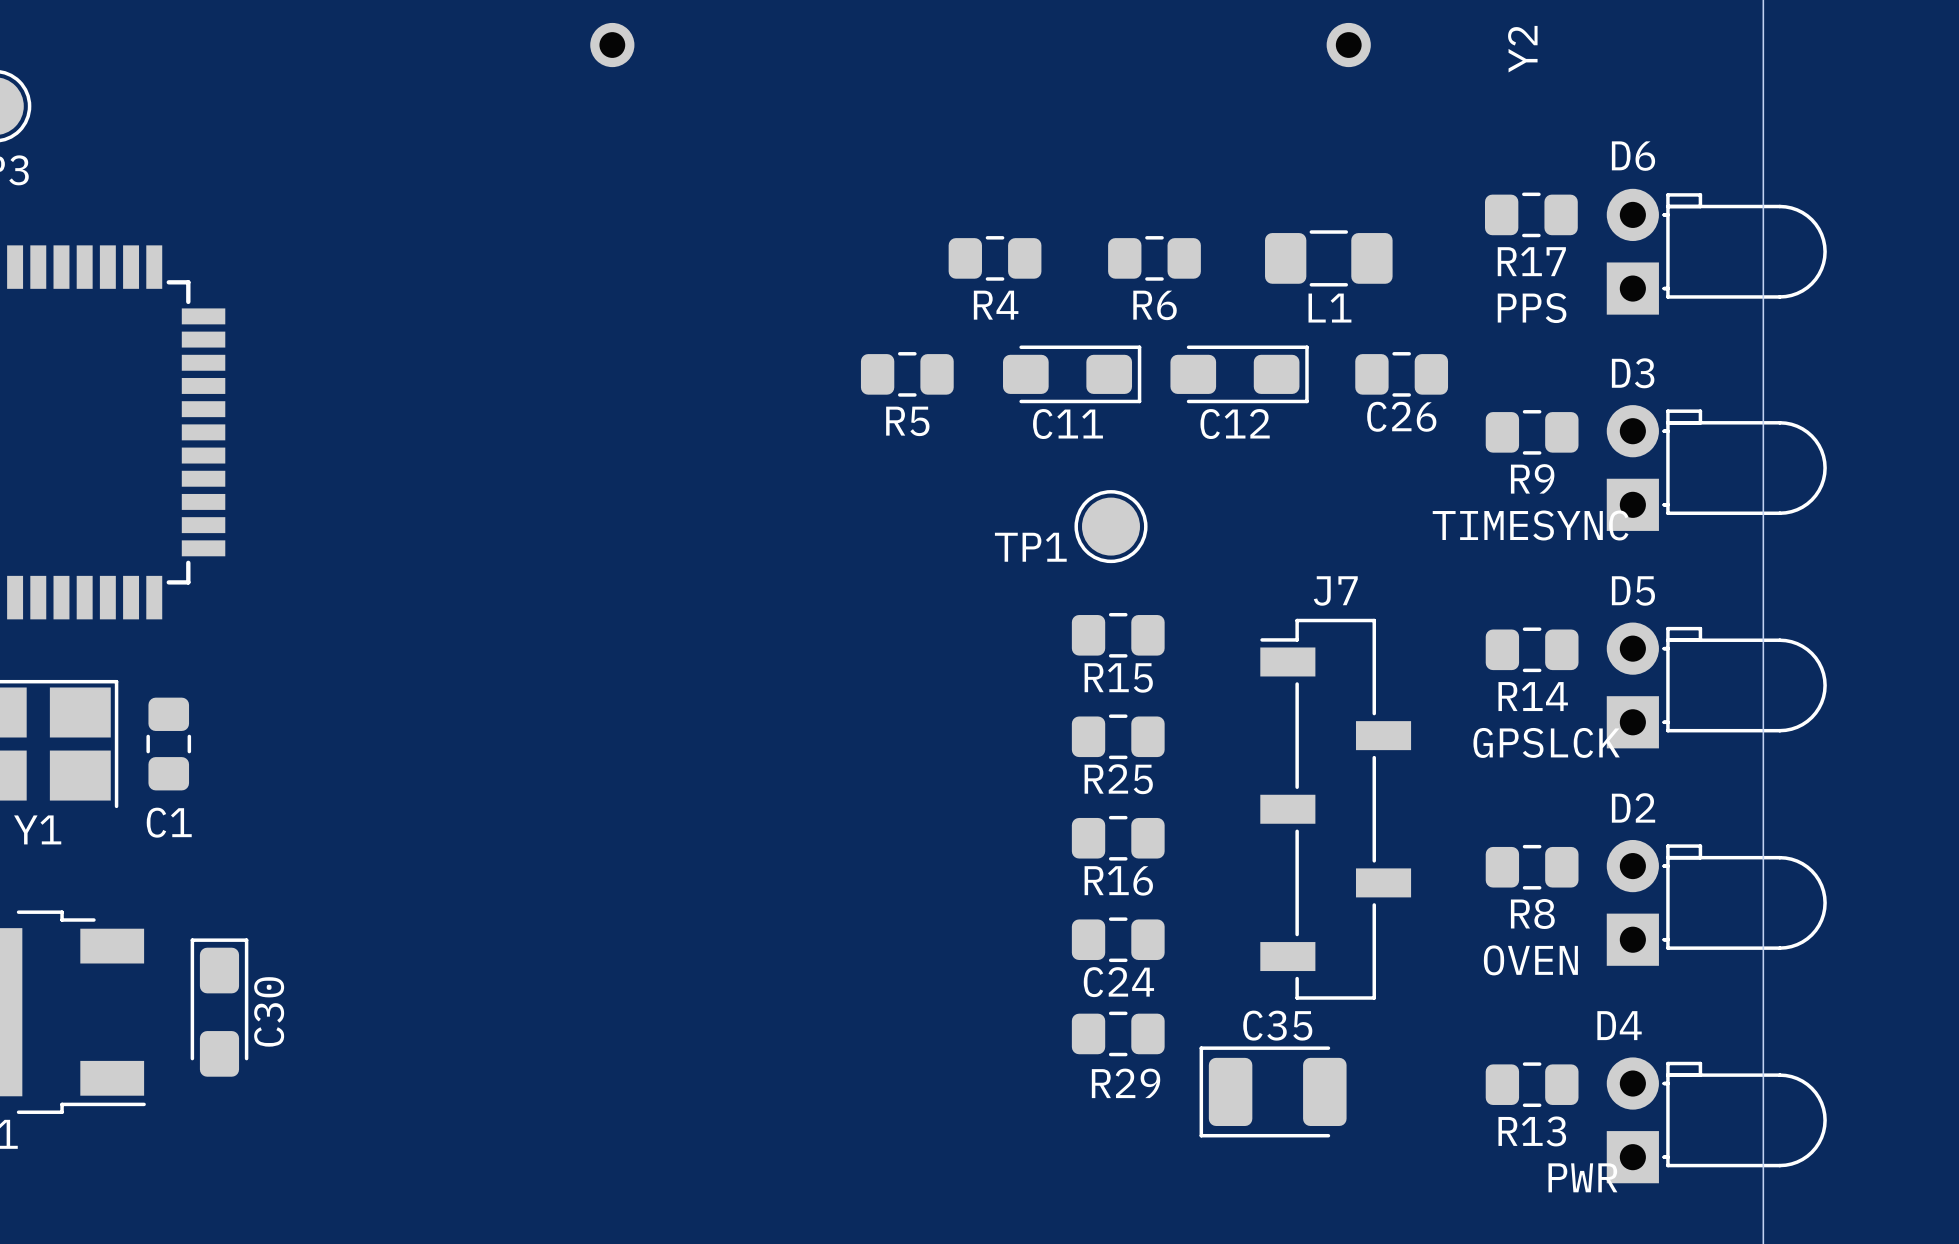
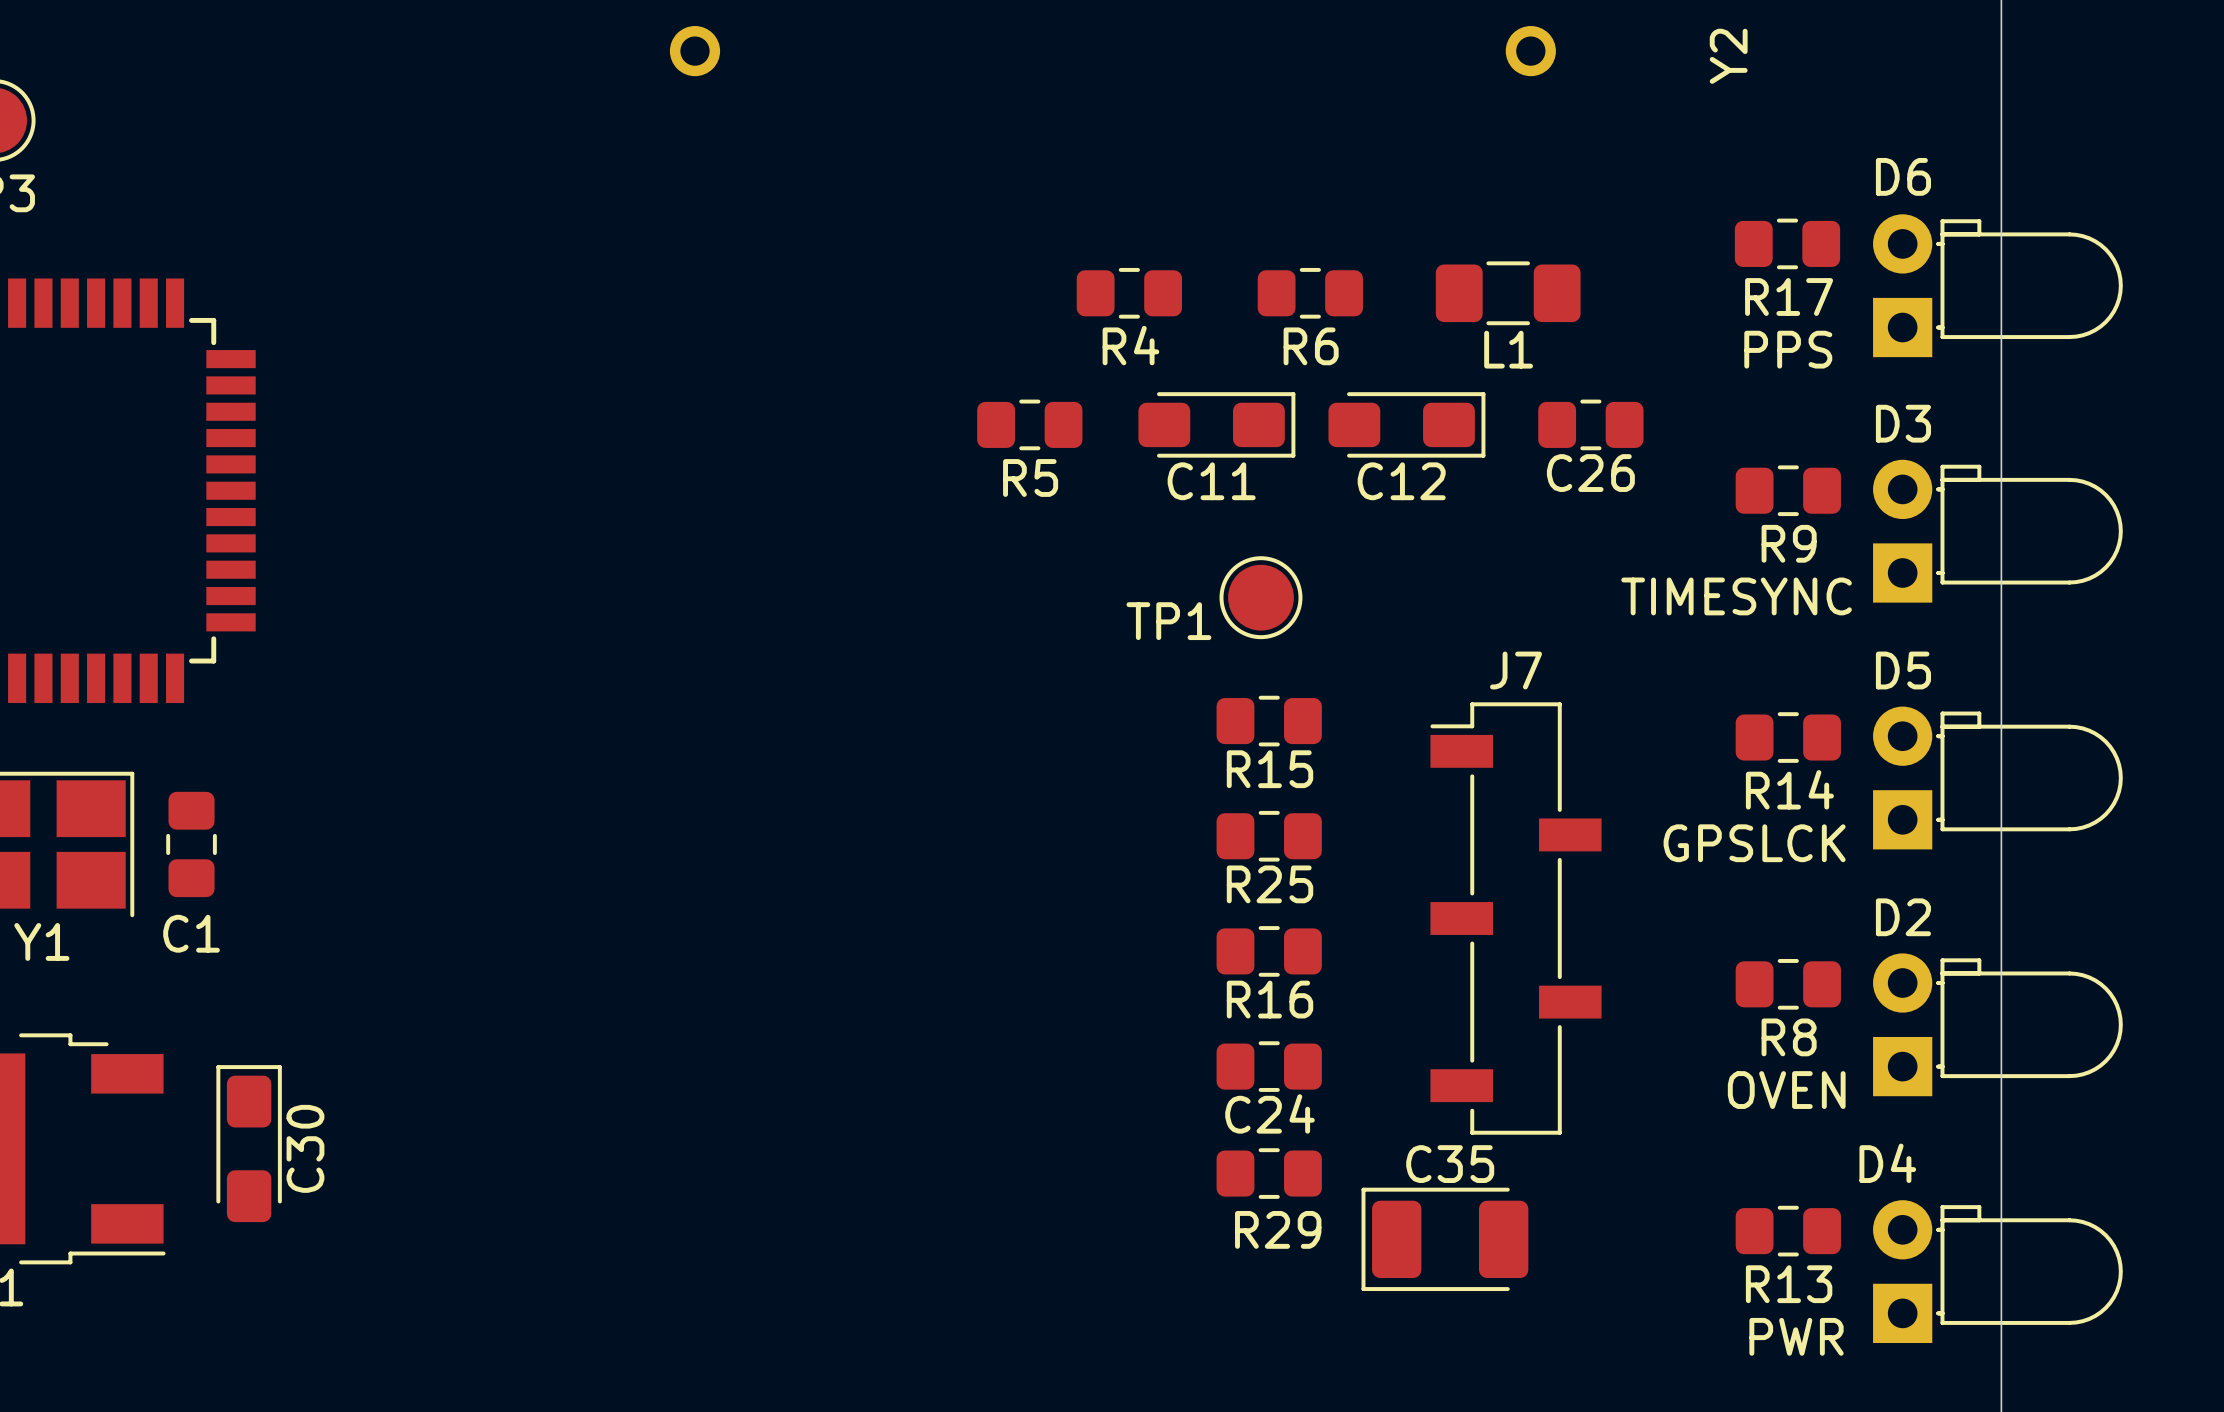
R17 position: (1531, 214) -> (1787, 243)
D6 position: (1716, 251) -> (1997, 285)
text position: PPS (1532, 308) -> PPS (1788, 349)
R9 position: (1532, 432) -> (1788, 490)
D3 position: (1716, 468) -> (1997, 531)
R14 position: (1532, 649) -> (1788, 737)
D5 position: (1716, 685) -> (1997, 778)
R8 position: (1532, 867) -> (1788, 984)
D2 position: (1716, 902) -> (1997, 1024)
text position: OVEN (1530, 960) -> OVEN (1786, 1090)
R13 position: (1532, 1084) -> (1788, 1231)
D4 position: (1716, 1120) -> (1997, 1271)

